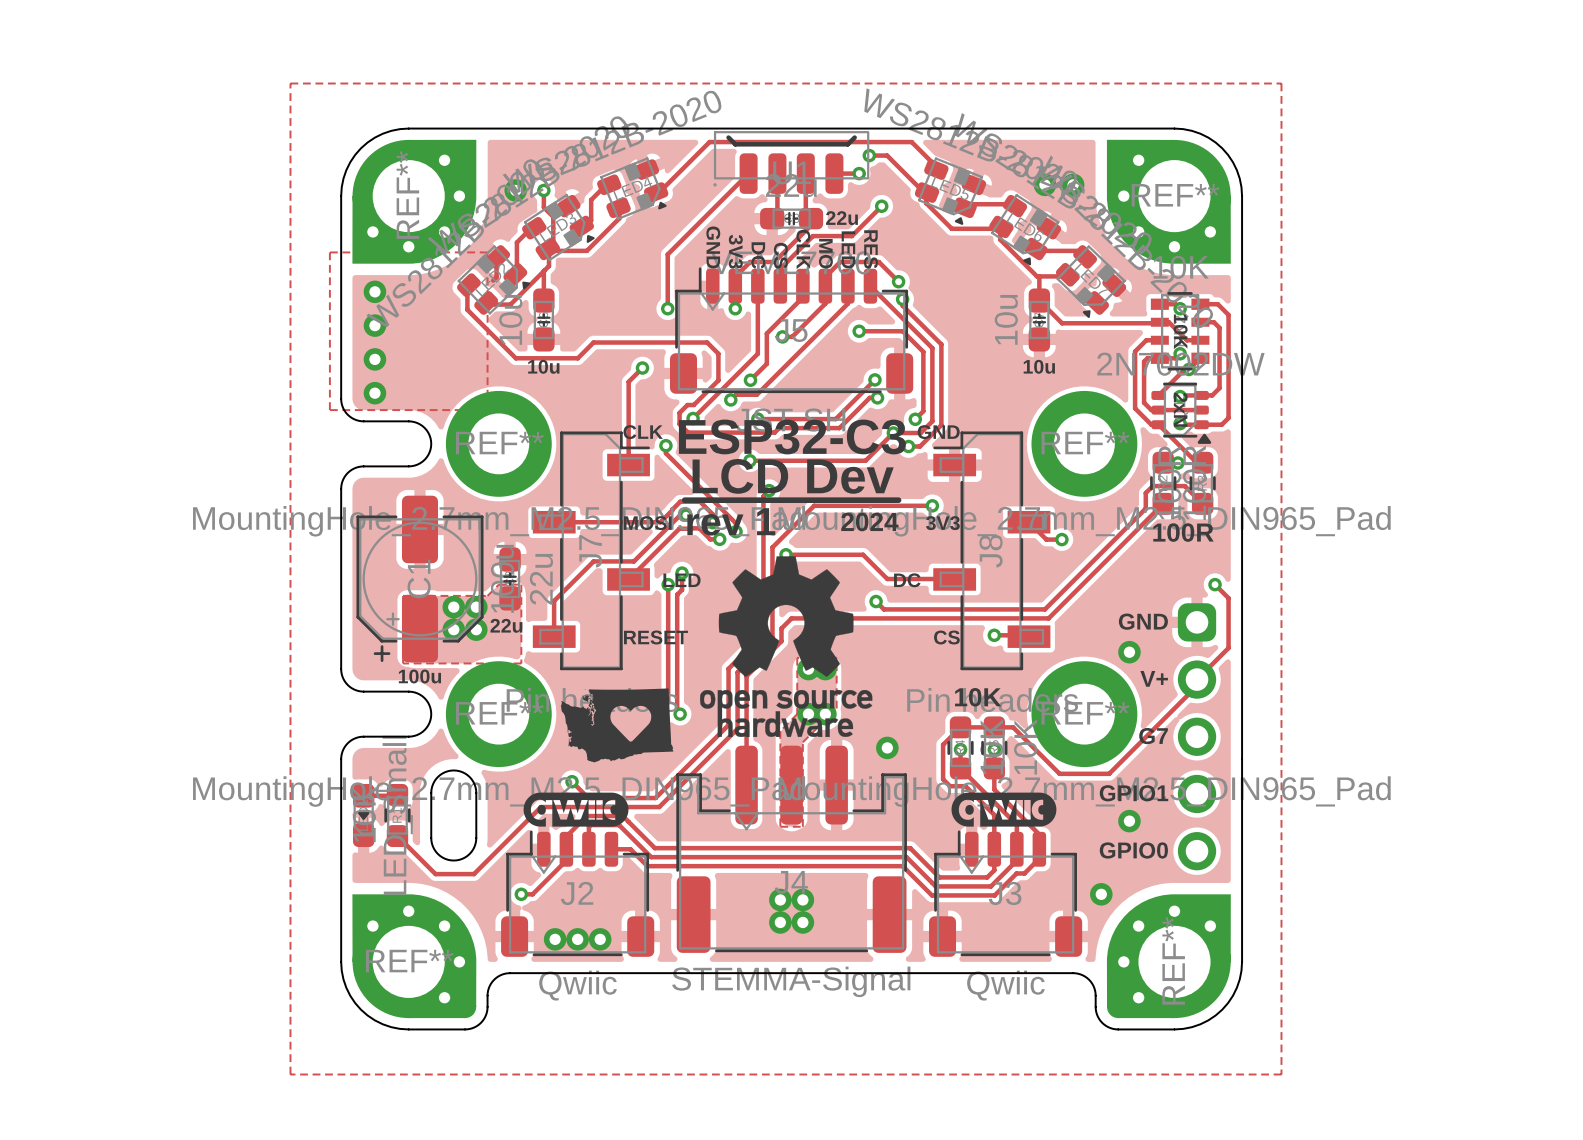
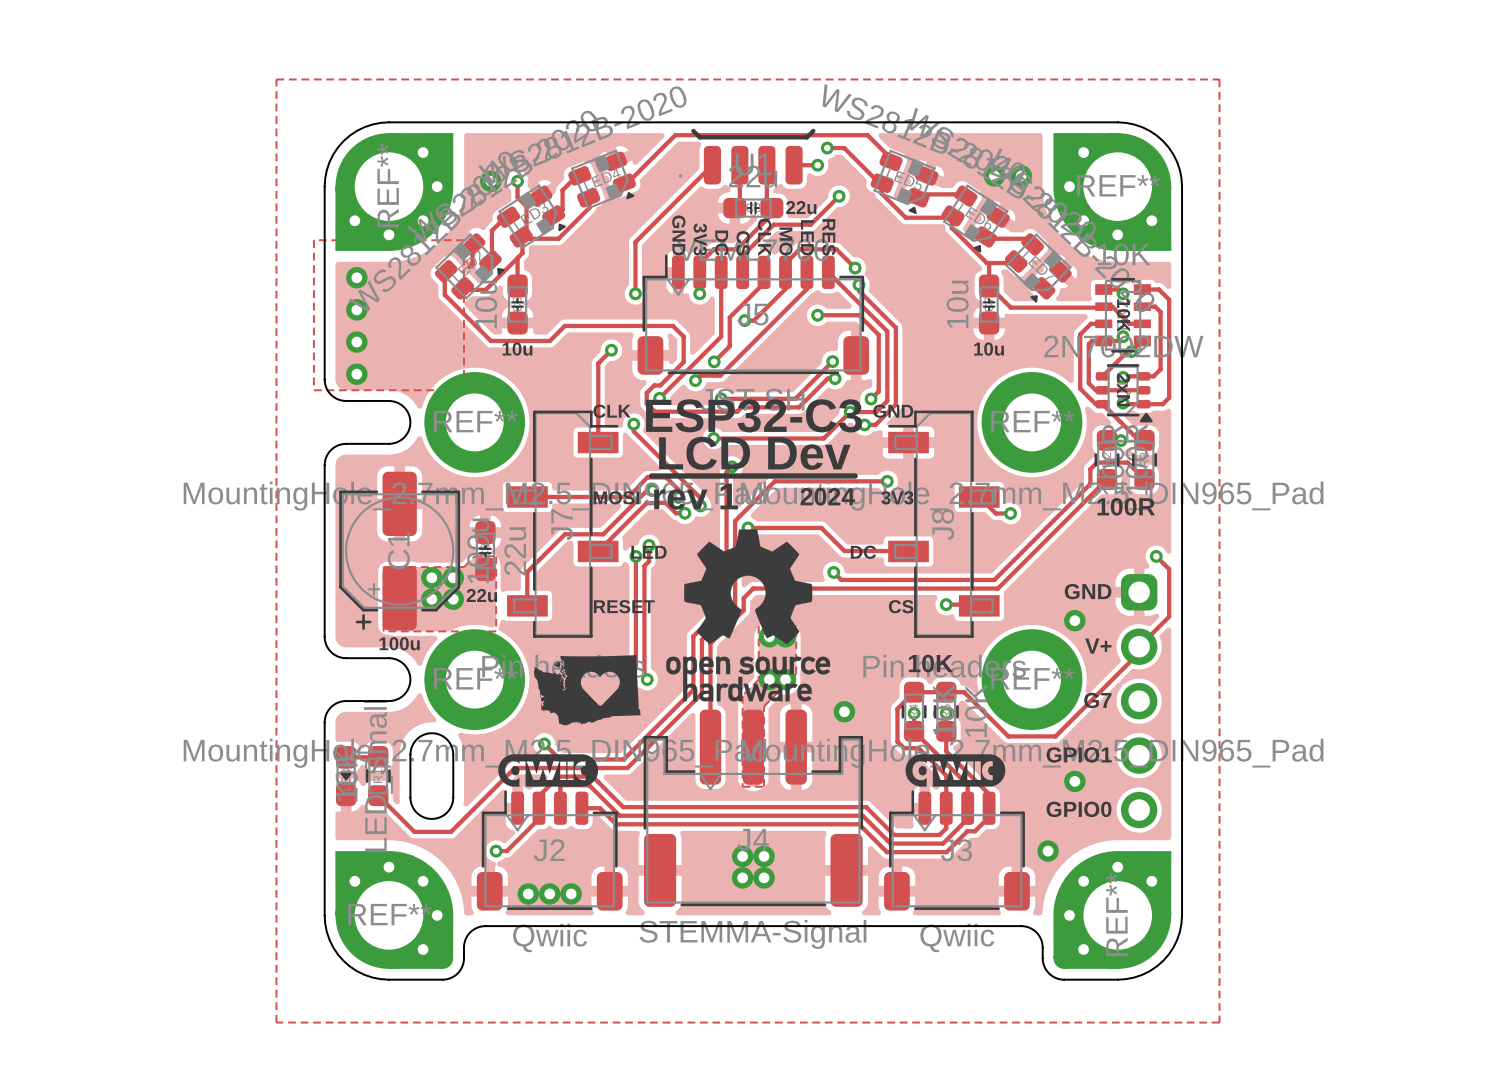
part footprint: [713, 131, 870, 194] -> [679, 128, 816, 185]

